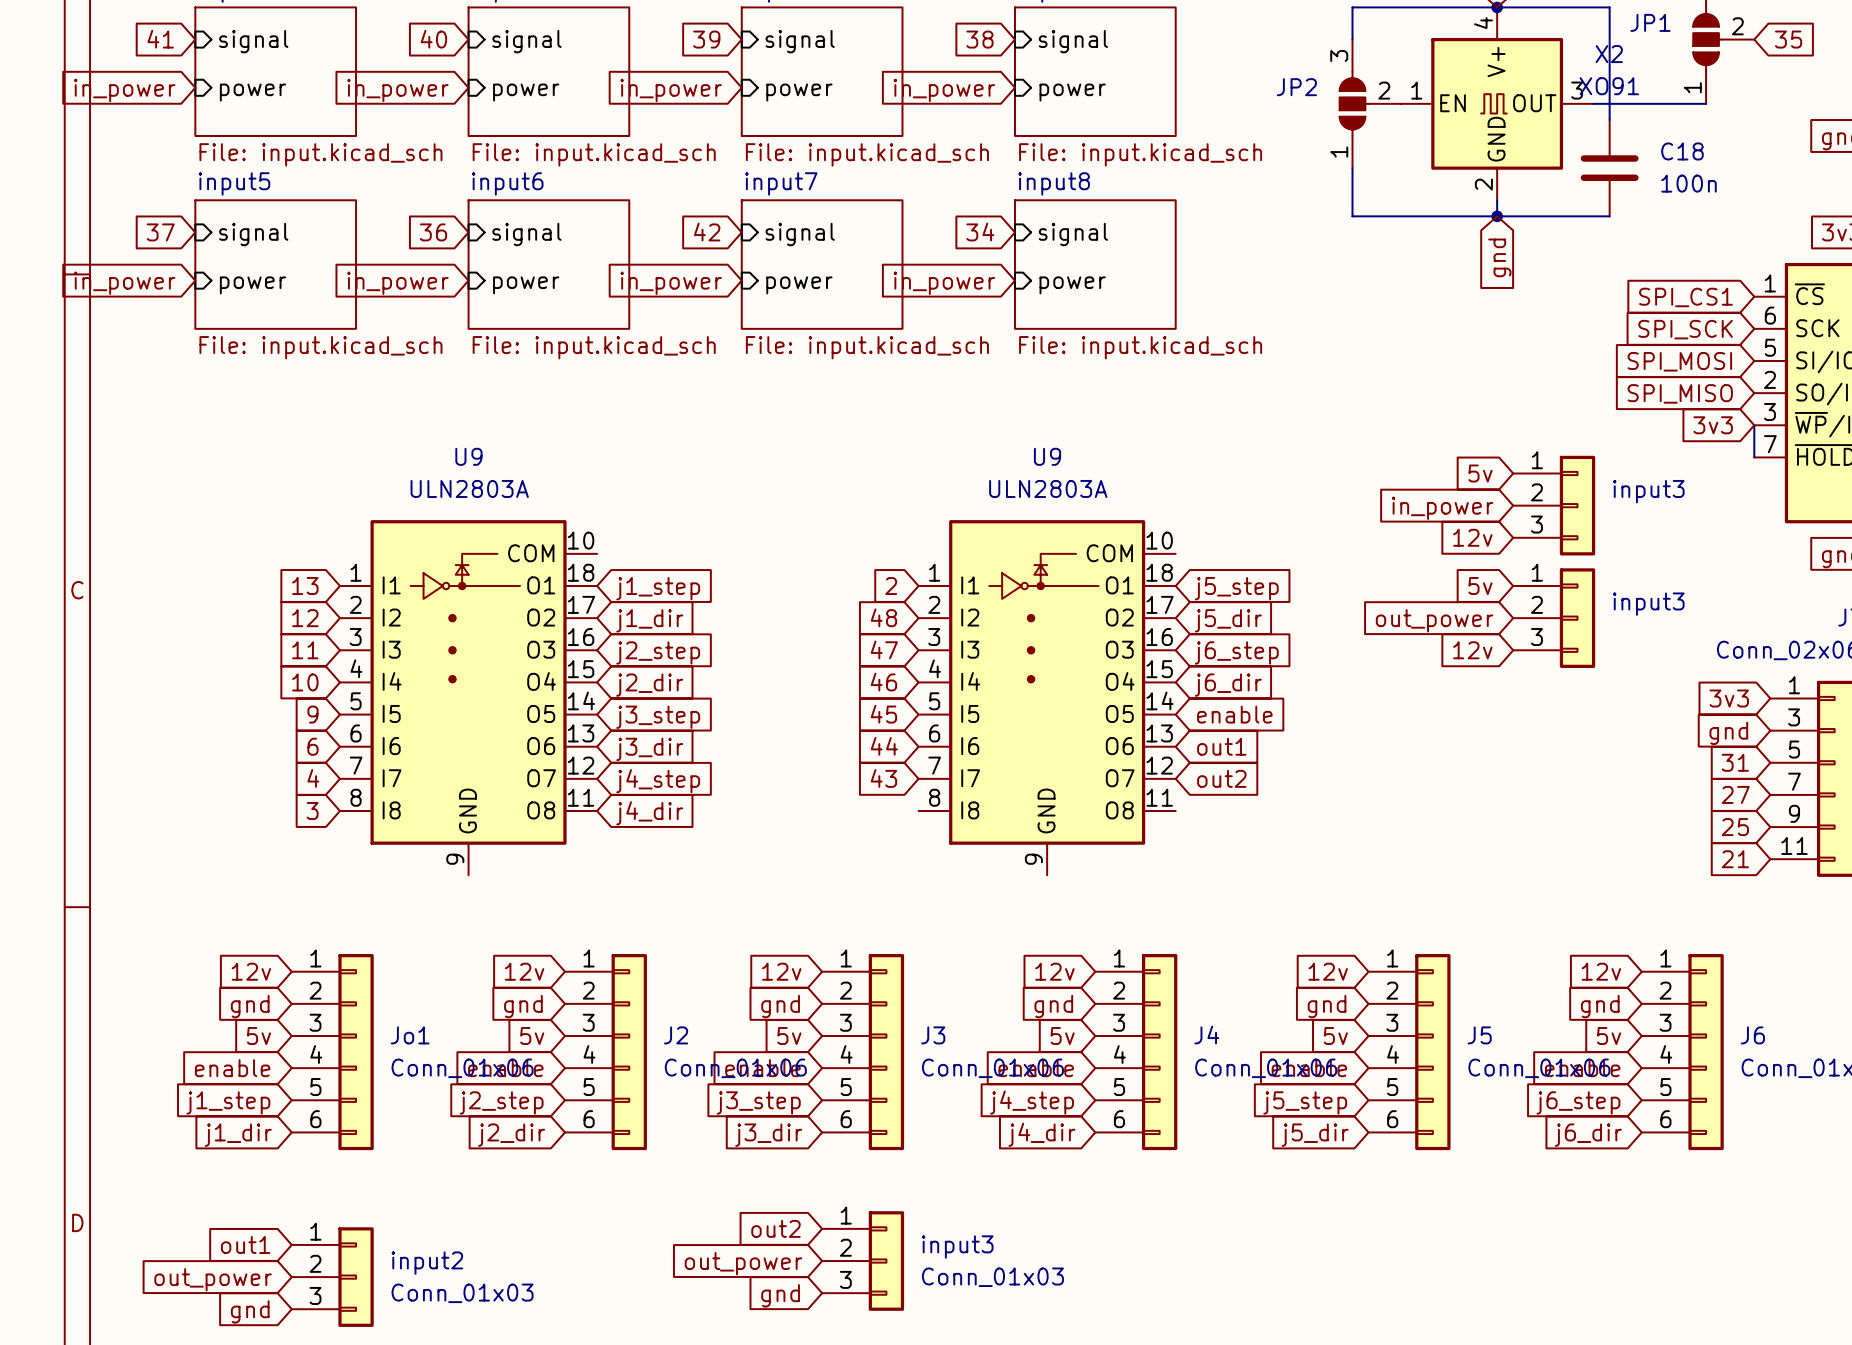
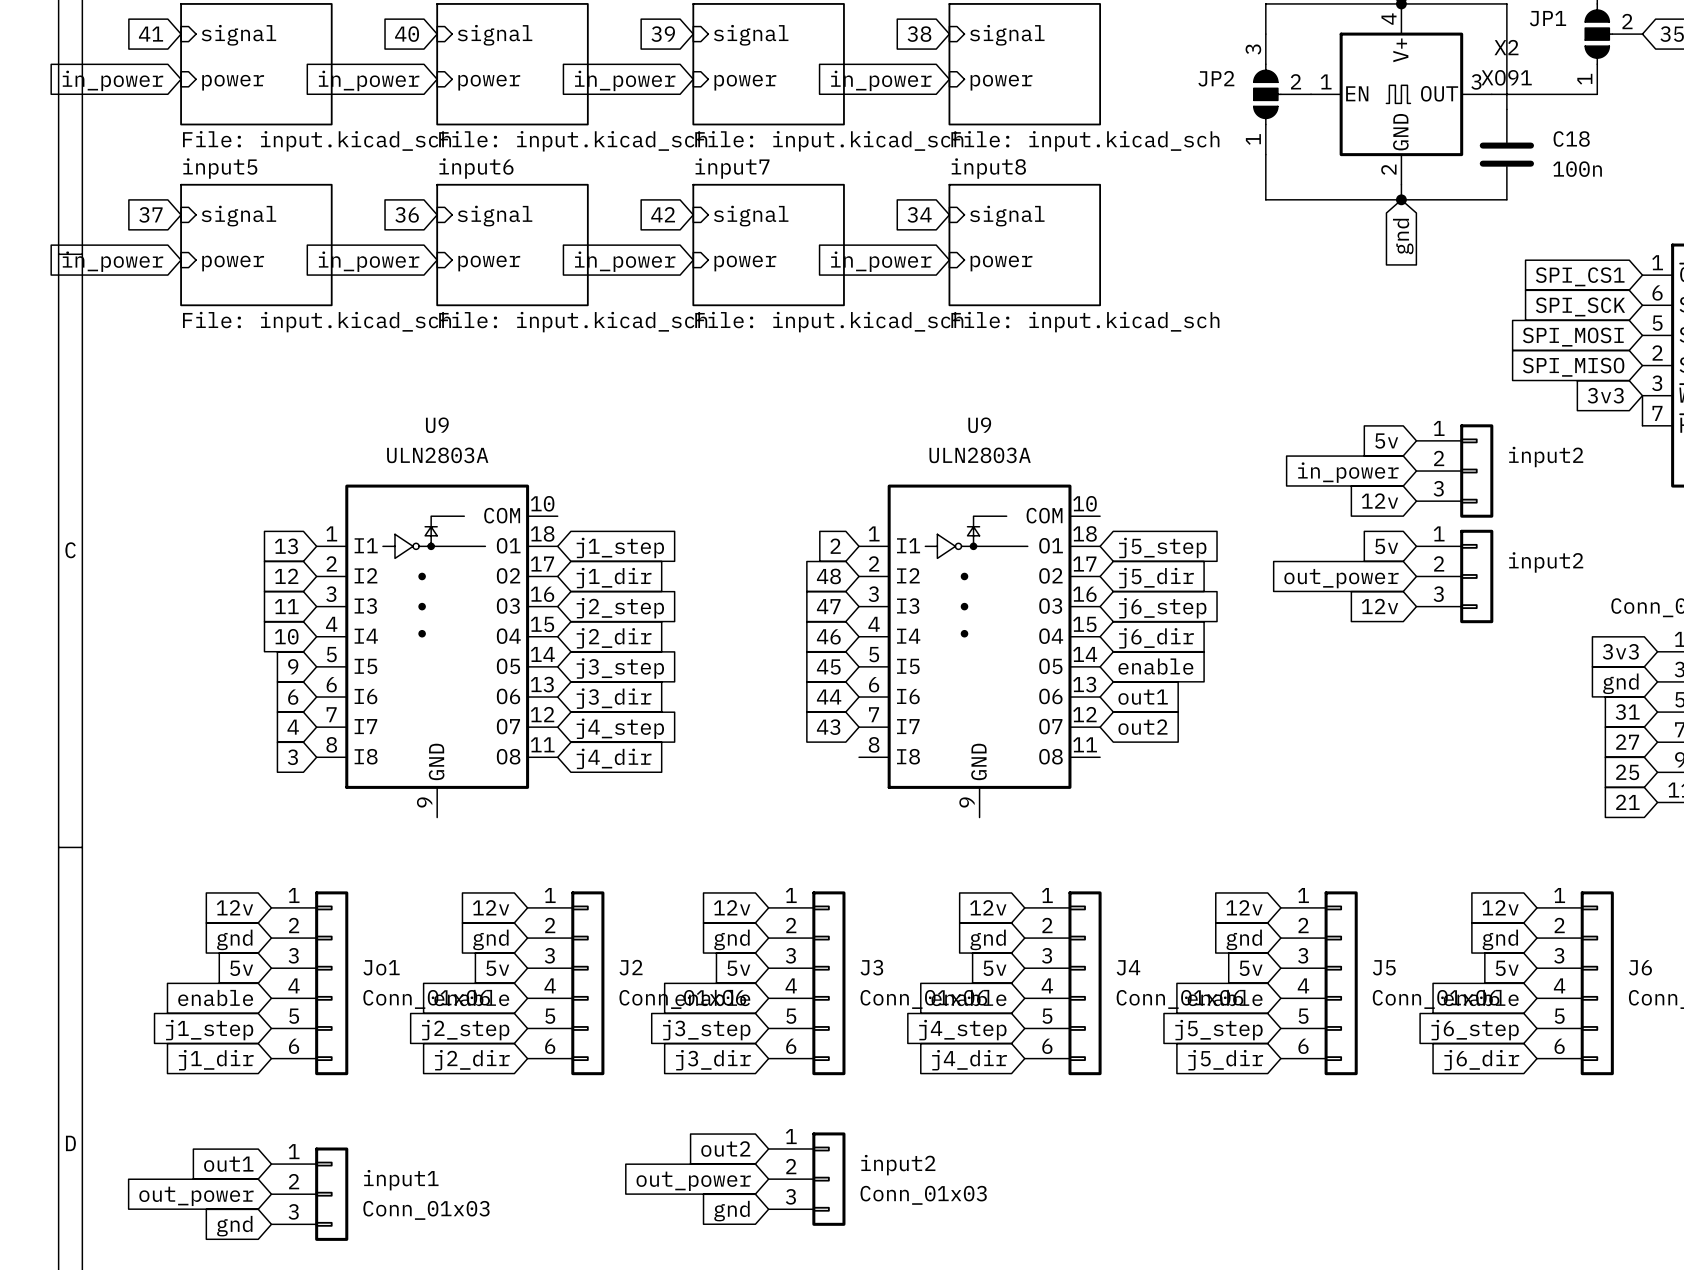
input3 name: input3 (1648, 491) -> input2 (1546, 457)
input3 name: input3 (1648, 604) -> input2 (1546, 562)
input3 name: input3 (957, 1247) -> input2 (898, 1165)
input2 name: input2 (427, 1263) -> input1 (401, 1180)

